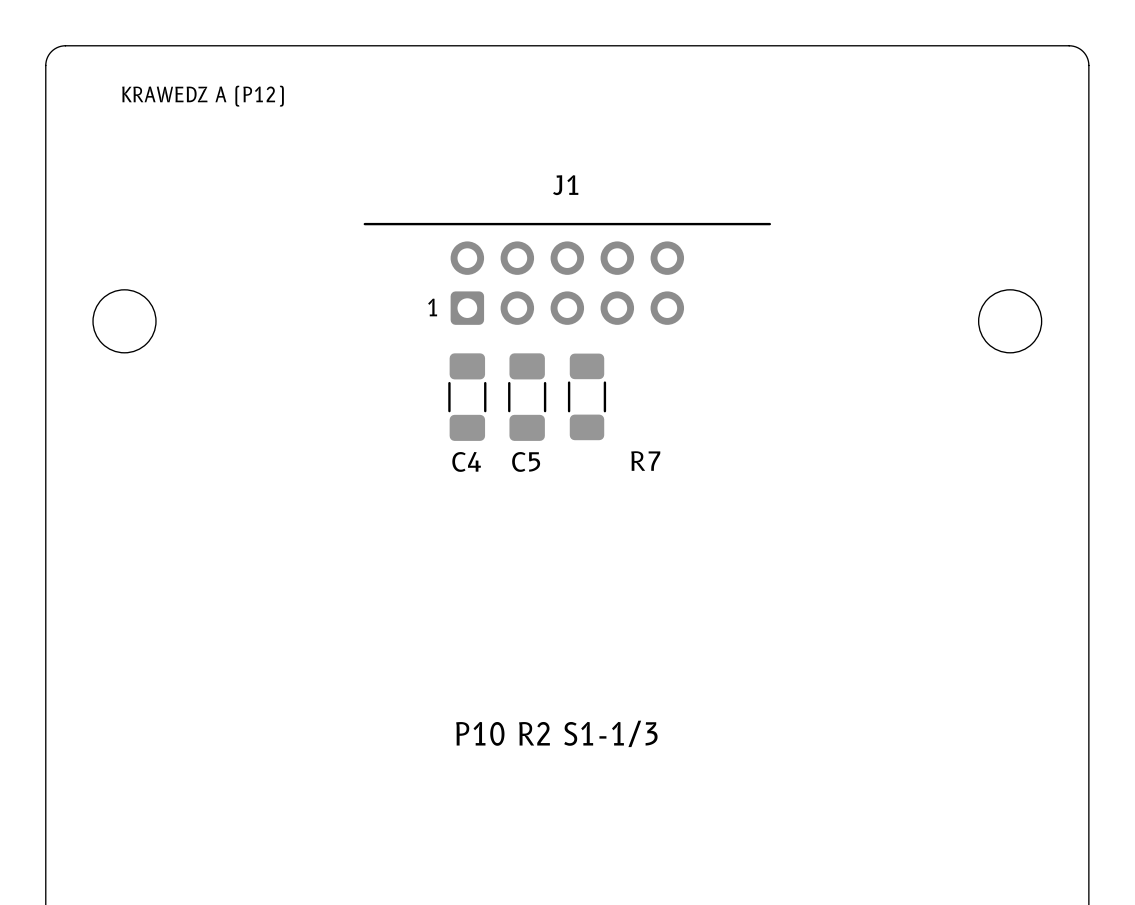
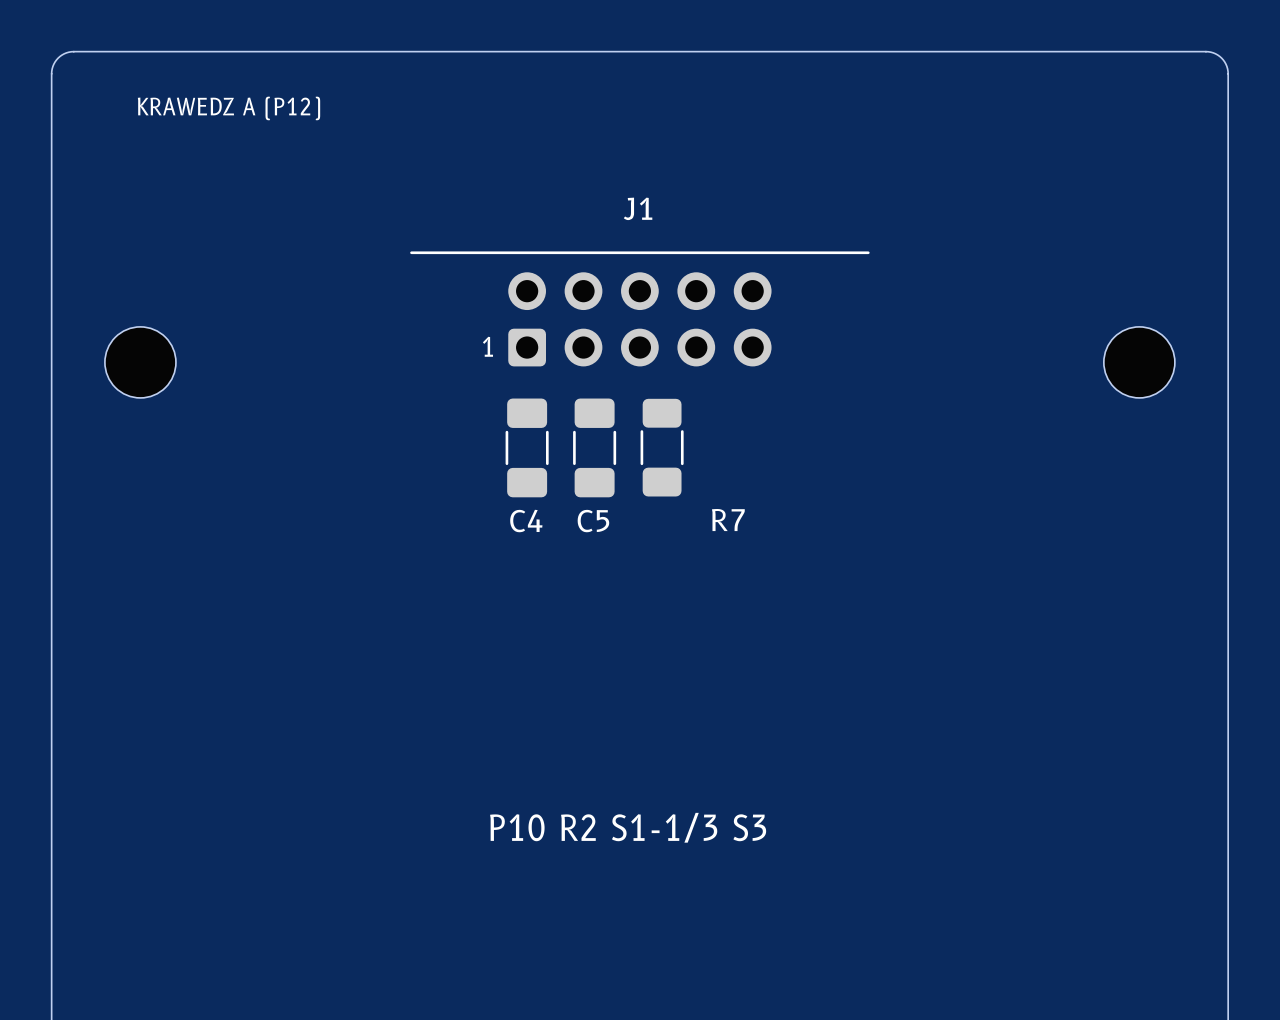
text: P10 R2 S1-1/3 (556, 733) -> P10 R2 S1-1/3 S3 (628, 827)

